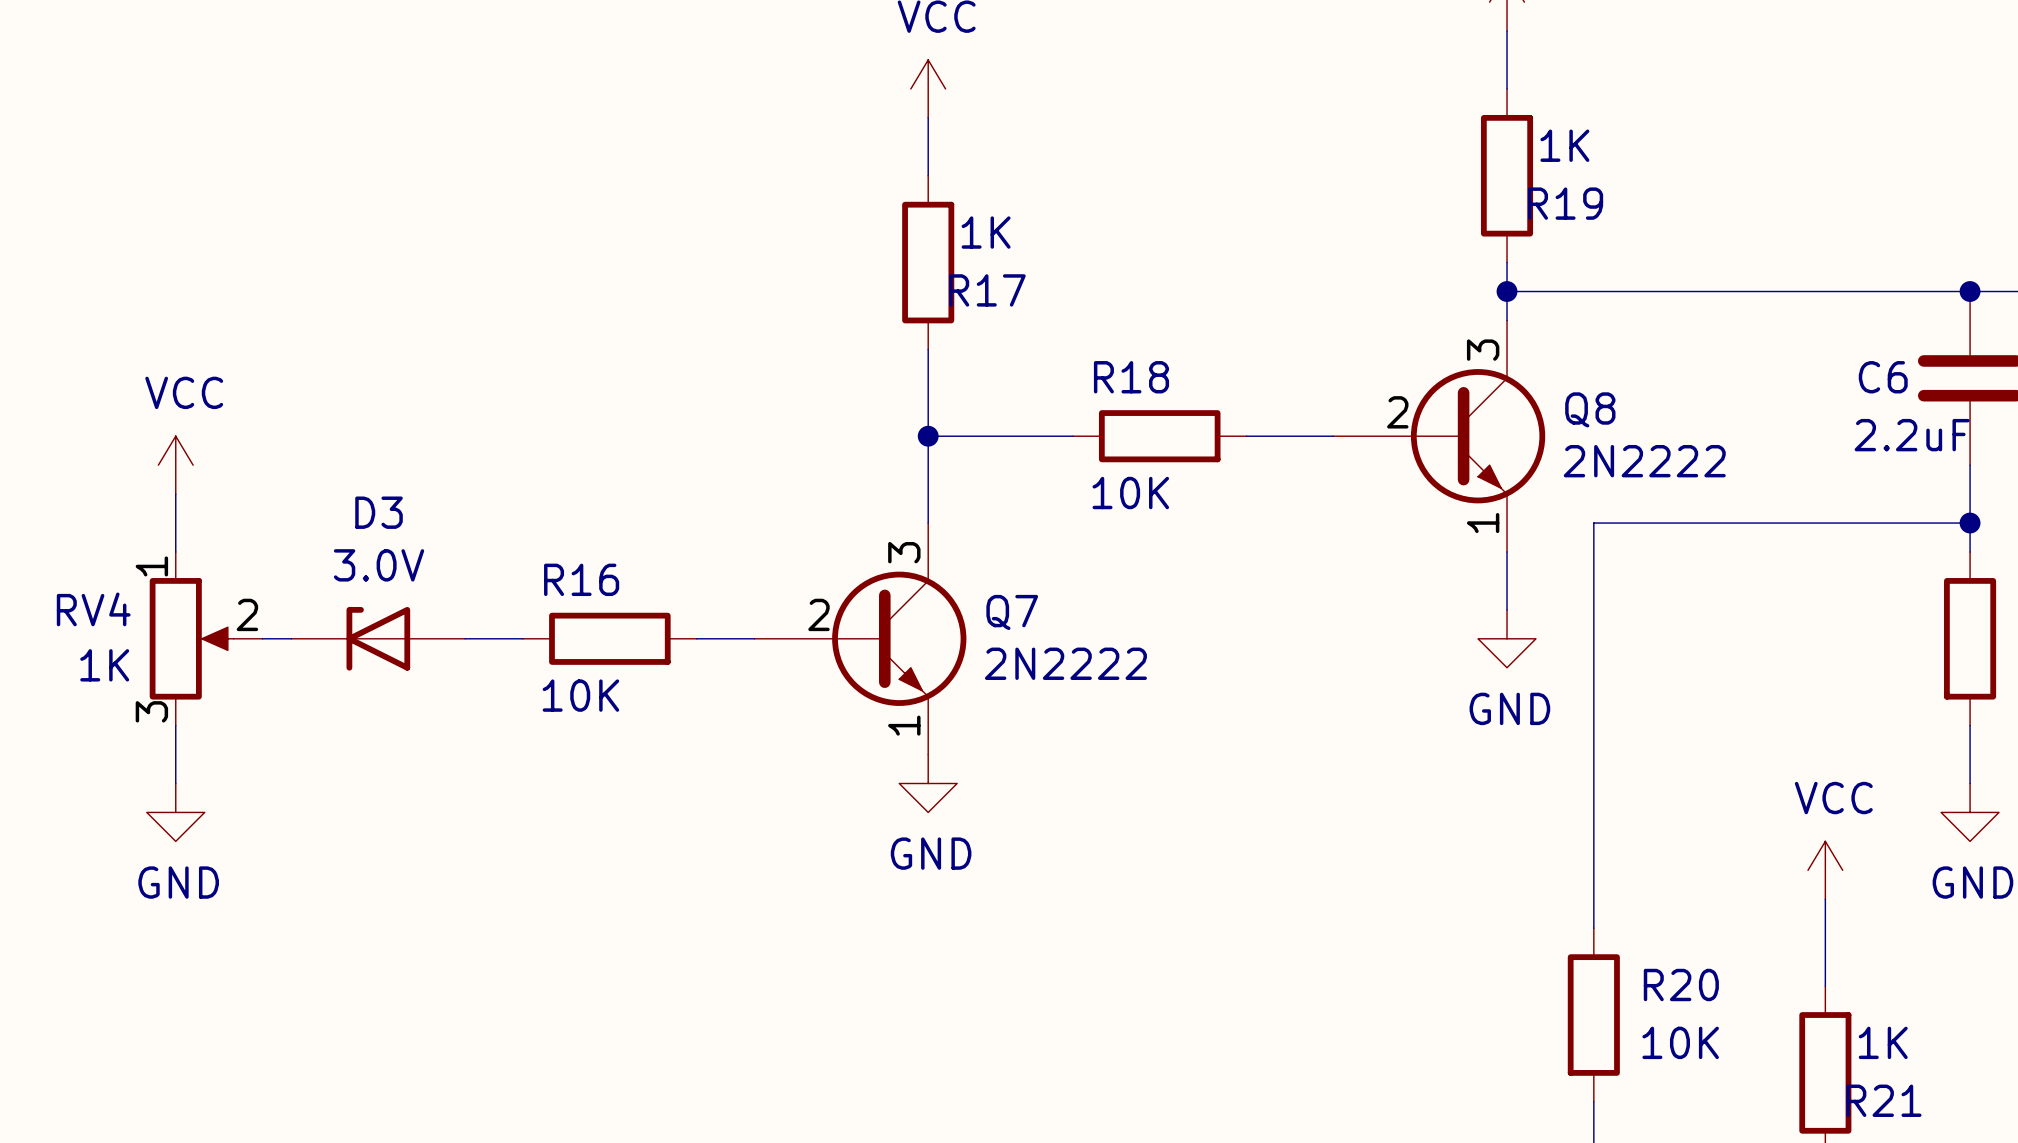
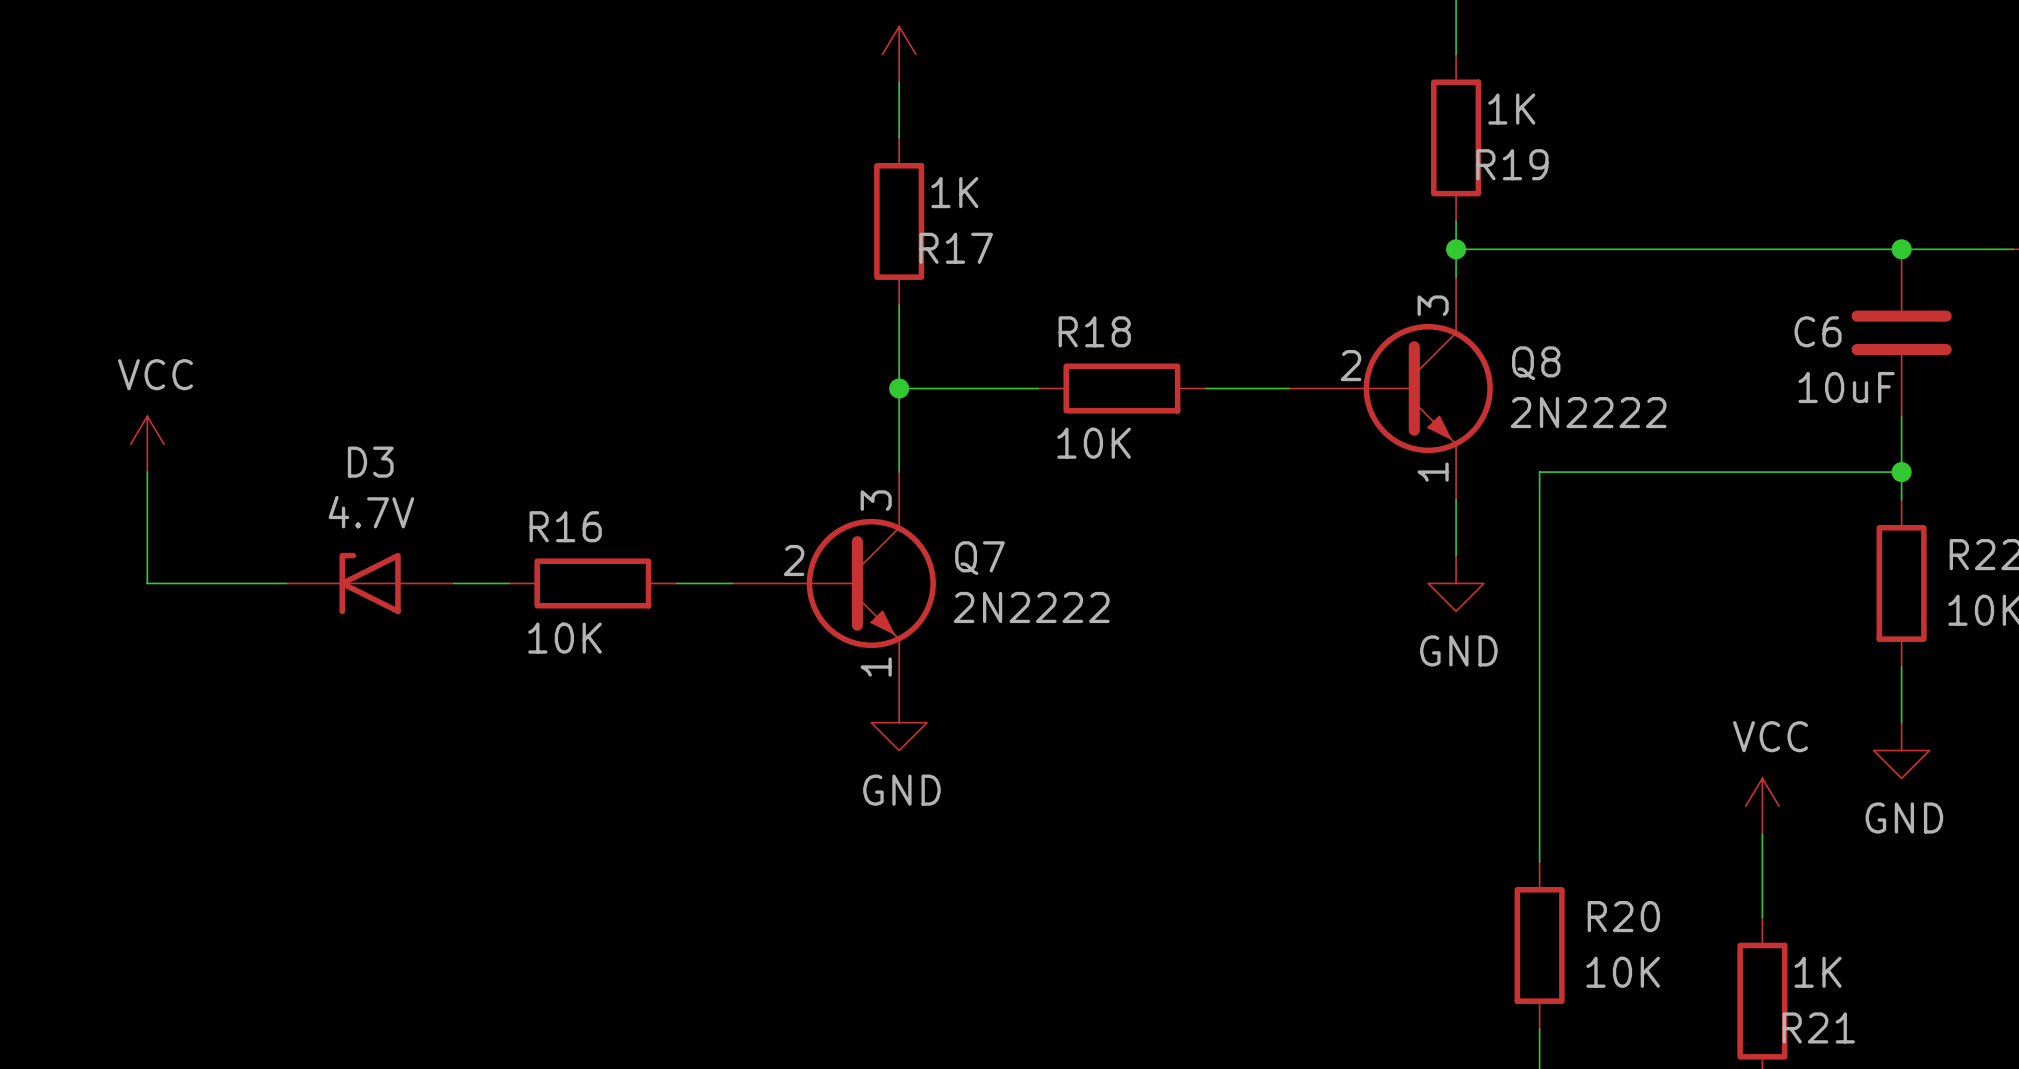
C6 value: 2.2uF (1912, 435) -> 10uF (1846, 387)
power symbol position: VCC (175, 465) -> VCC (147, 444)
wire: (175, 494) (175, 551) -> none
wire: none -> (147, 472) (147, 583) (258, 583)
D3 value: 3.0V (379, 565) -> 4.7V (371, 512)
RV4: 1K (206, 638) -> none
wire: (175, 725) (175, 783) -> none
power symbol: GND (175, 812) -> none

